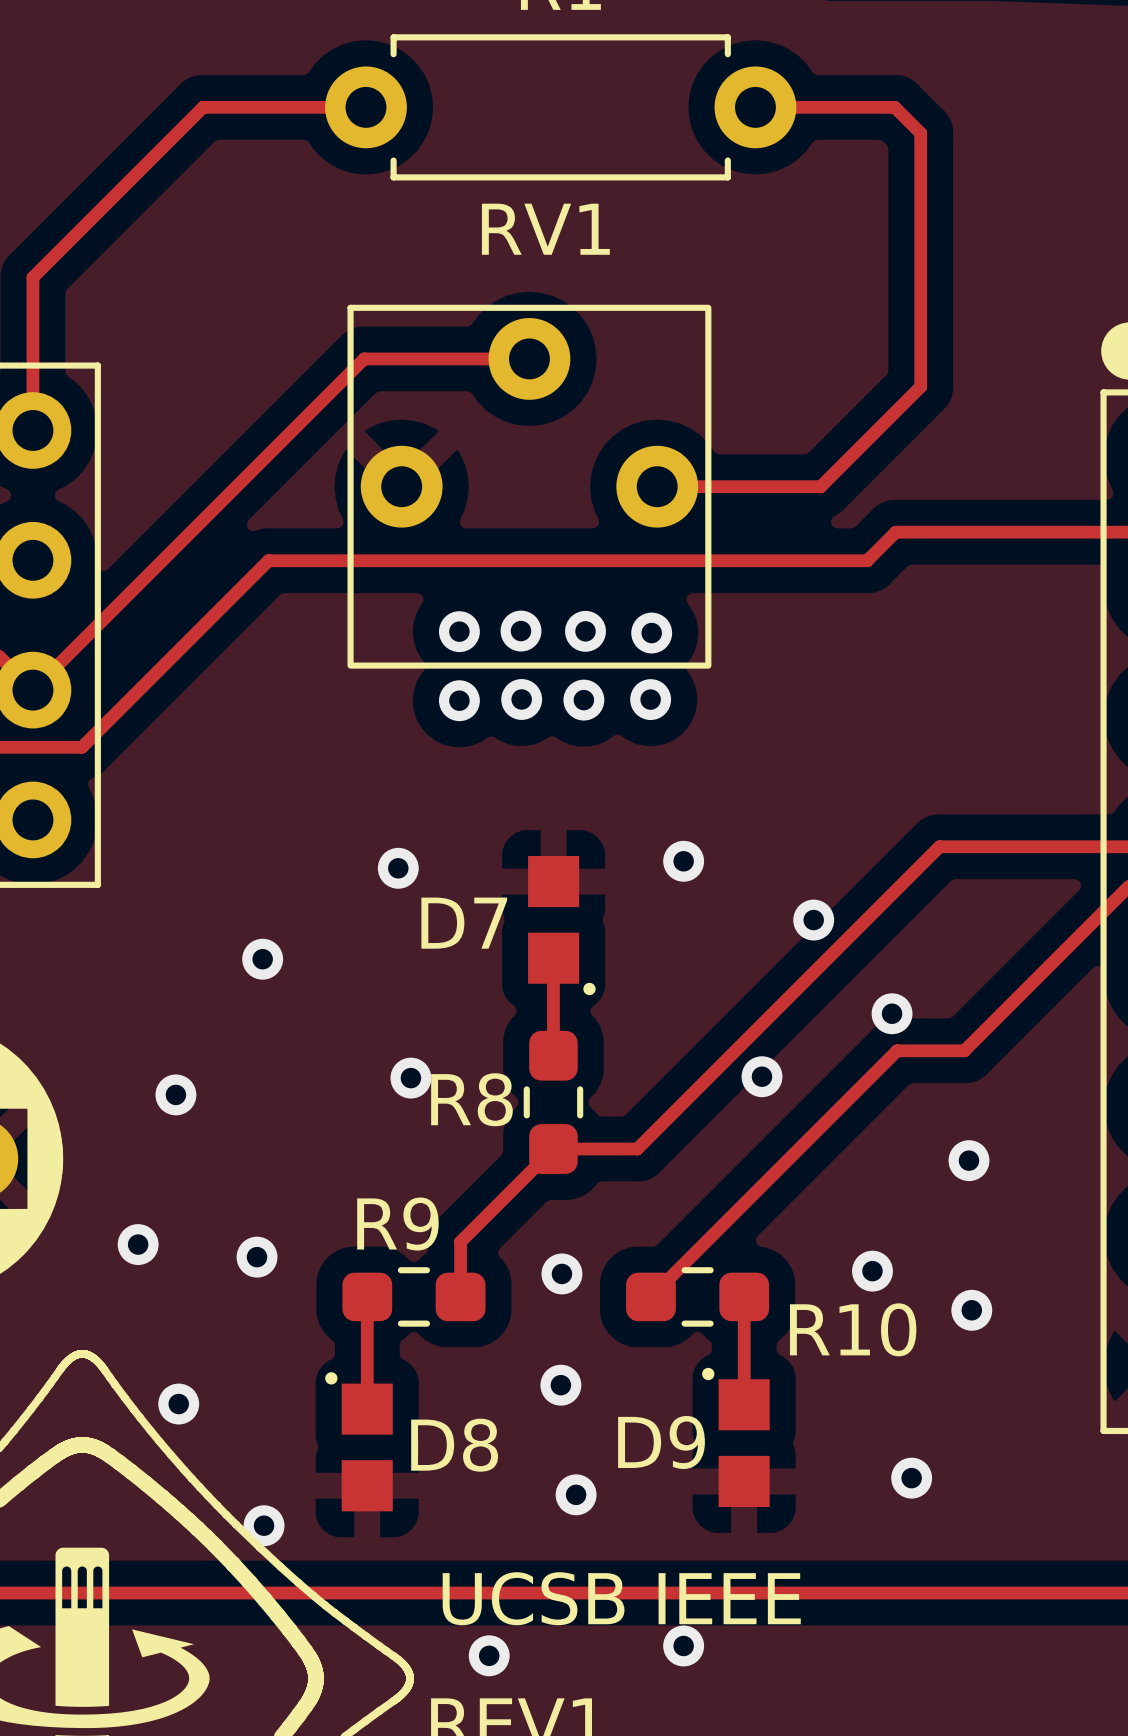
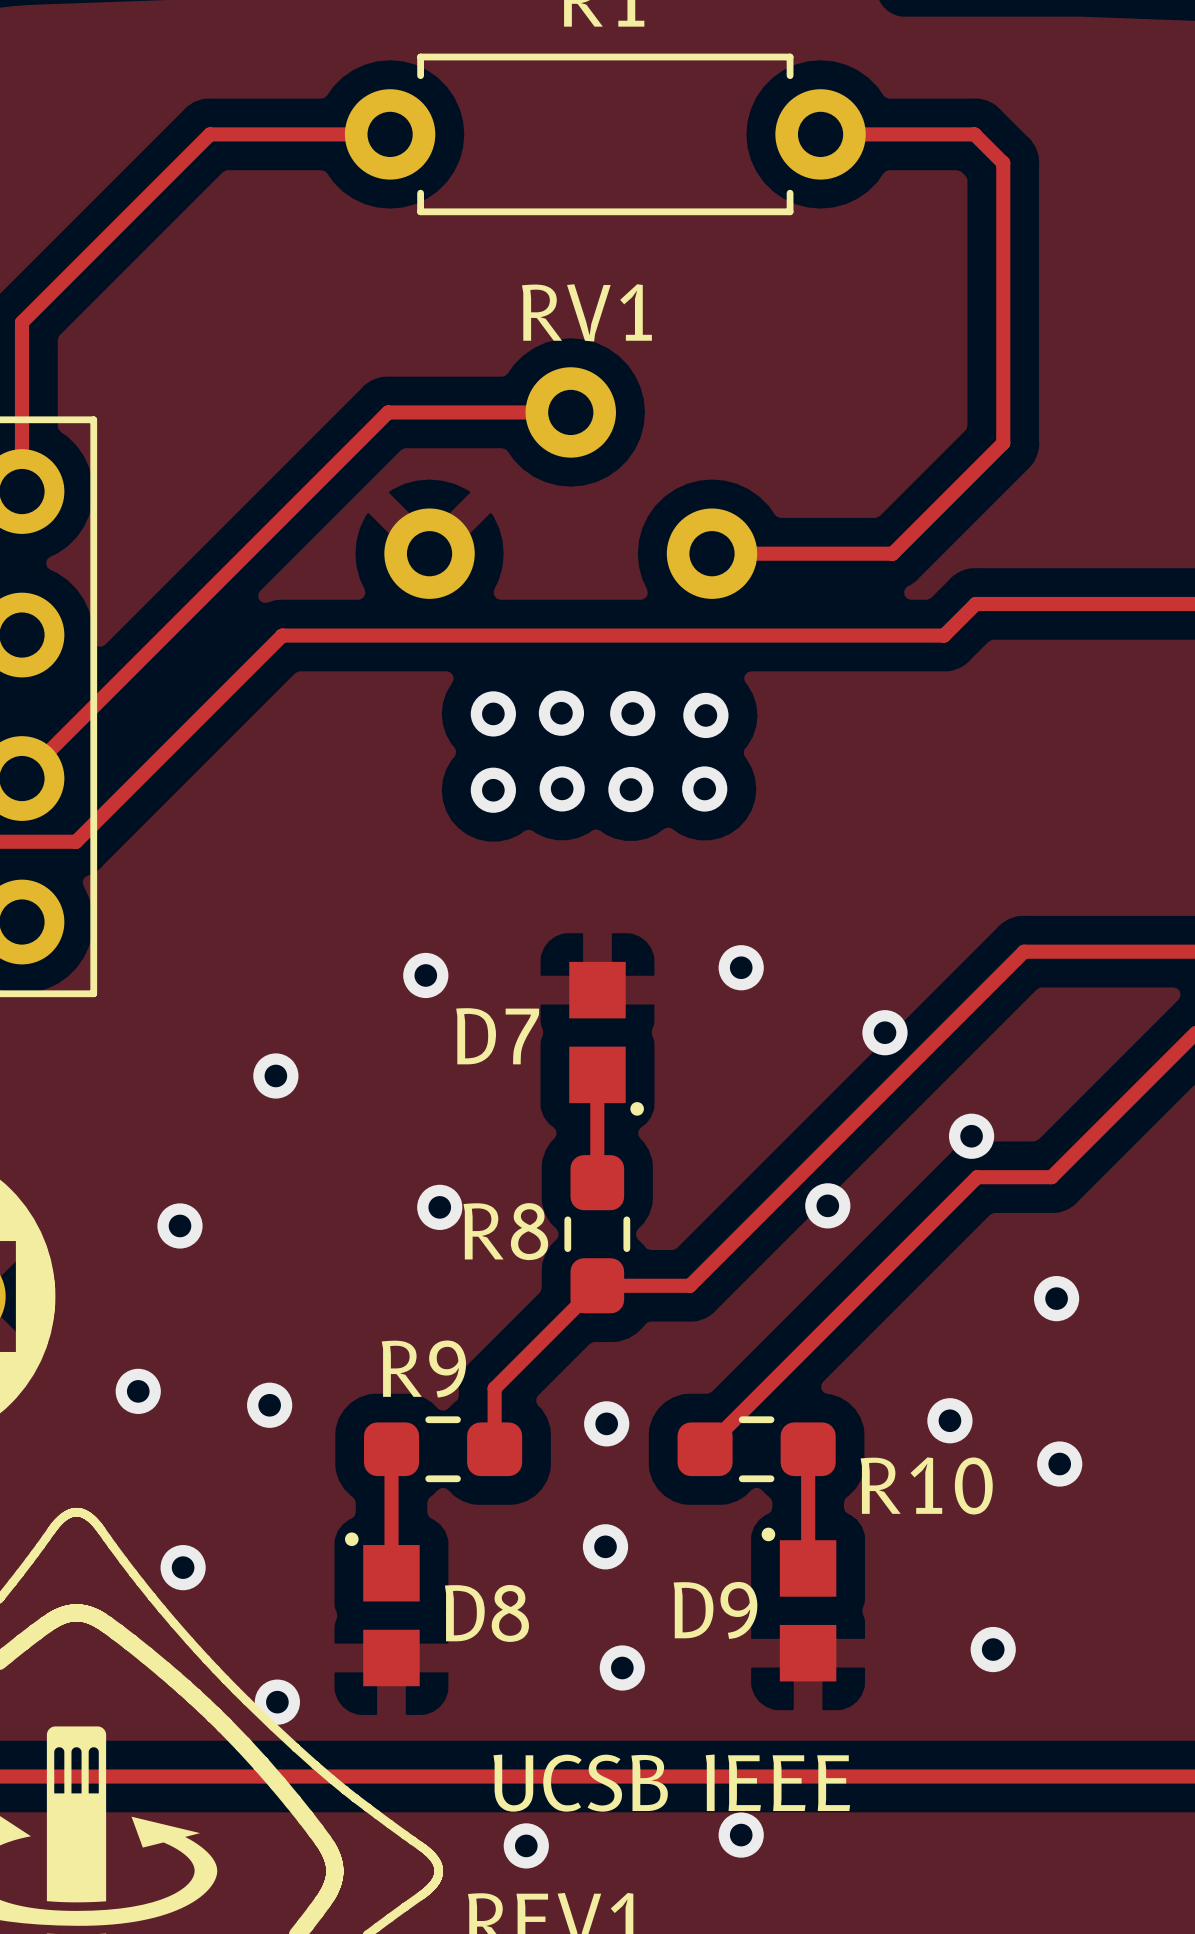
RV1 name position: RV1 (545, 229) -> RV1 (586, 312)
RV1 footprint: [347, 304, 712, 669] -> [384, 367, 758, 599]

